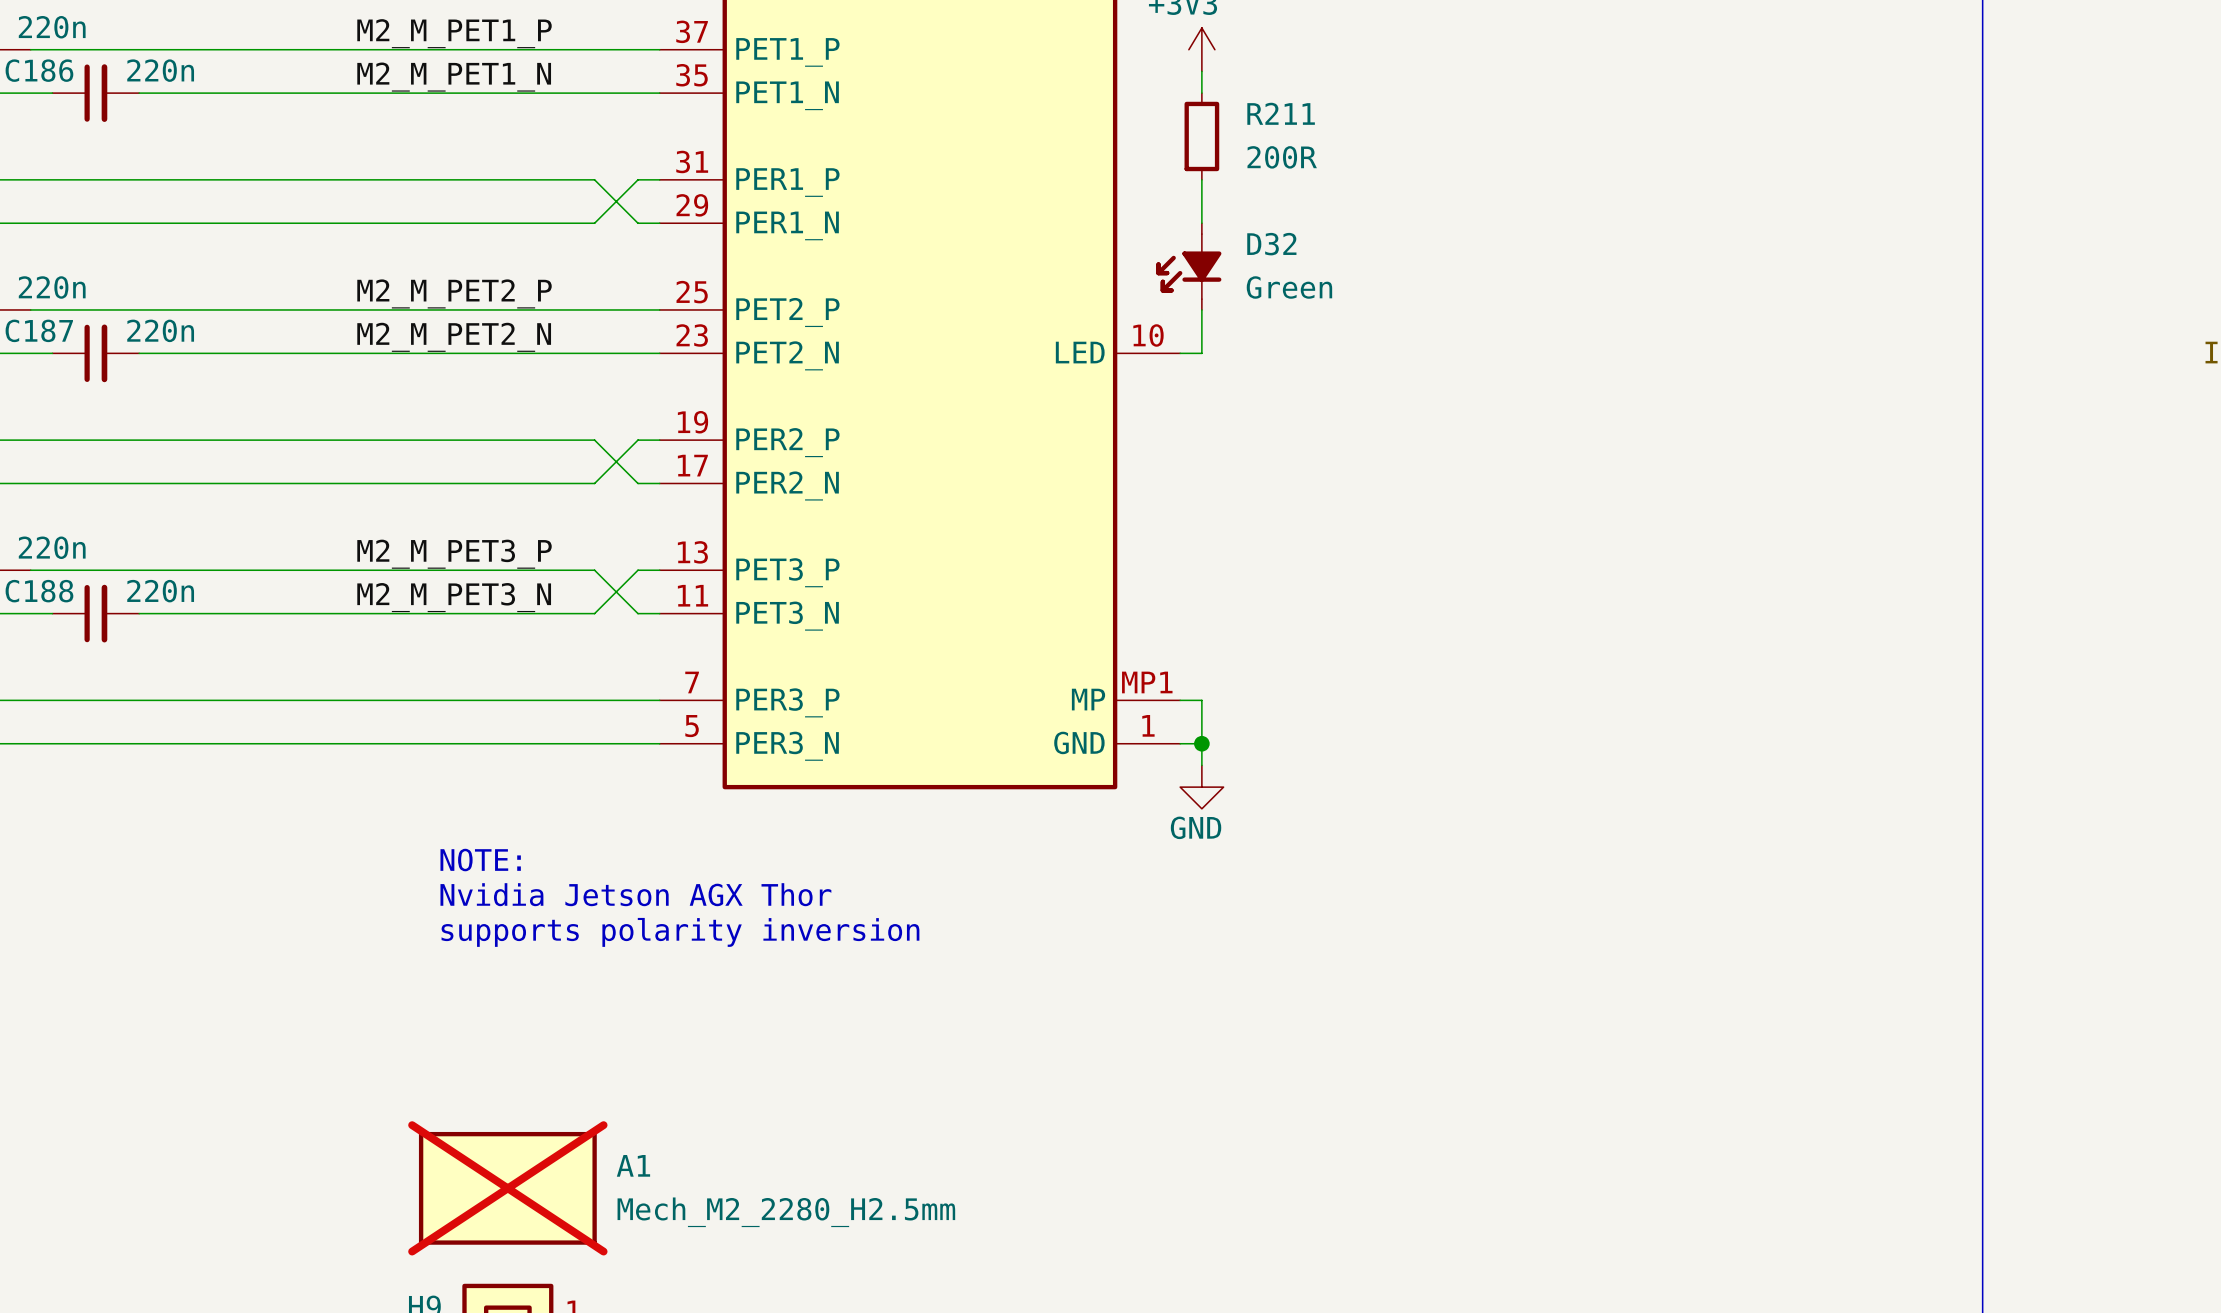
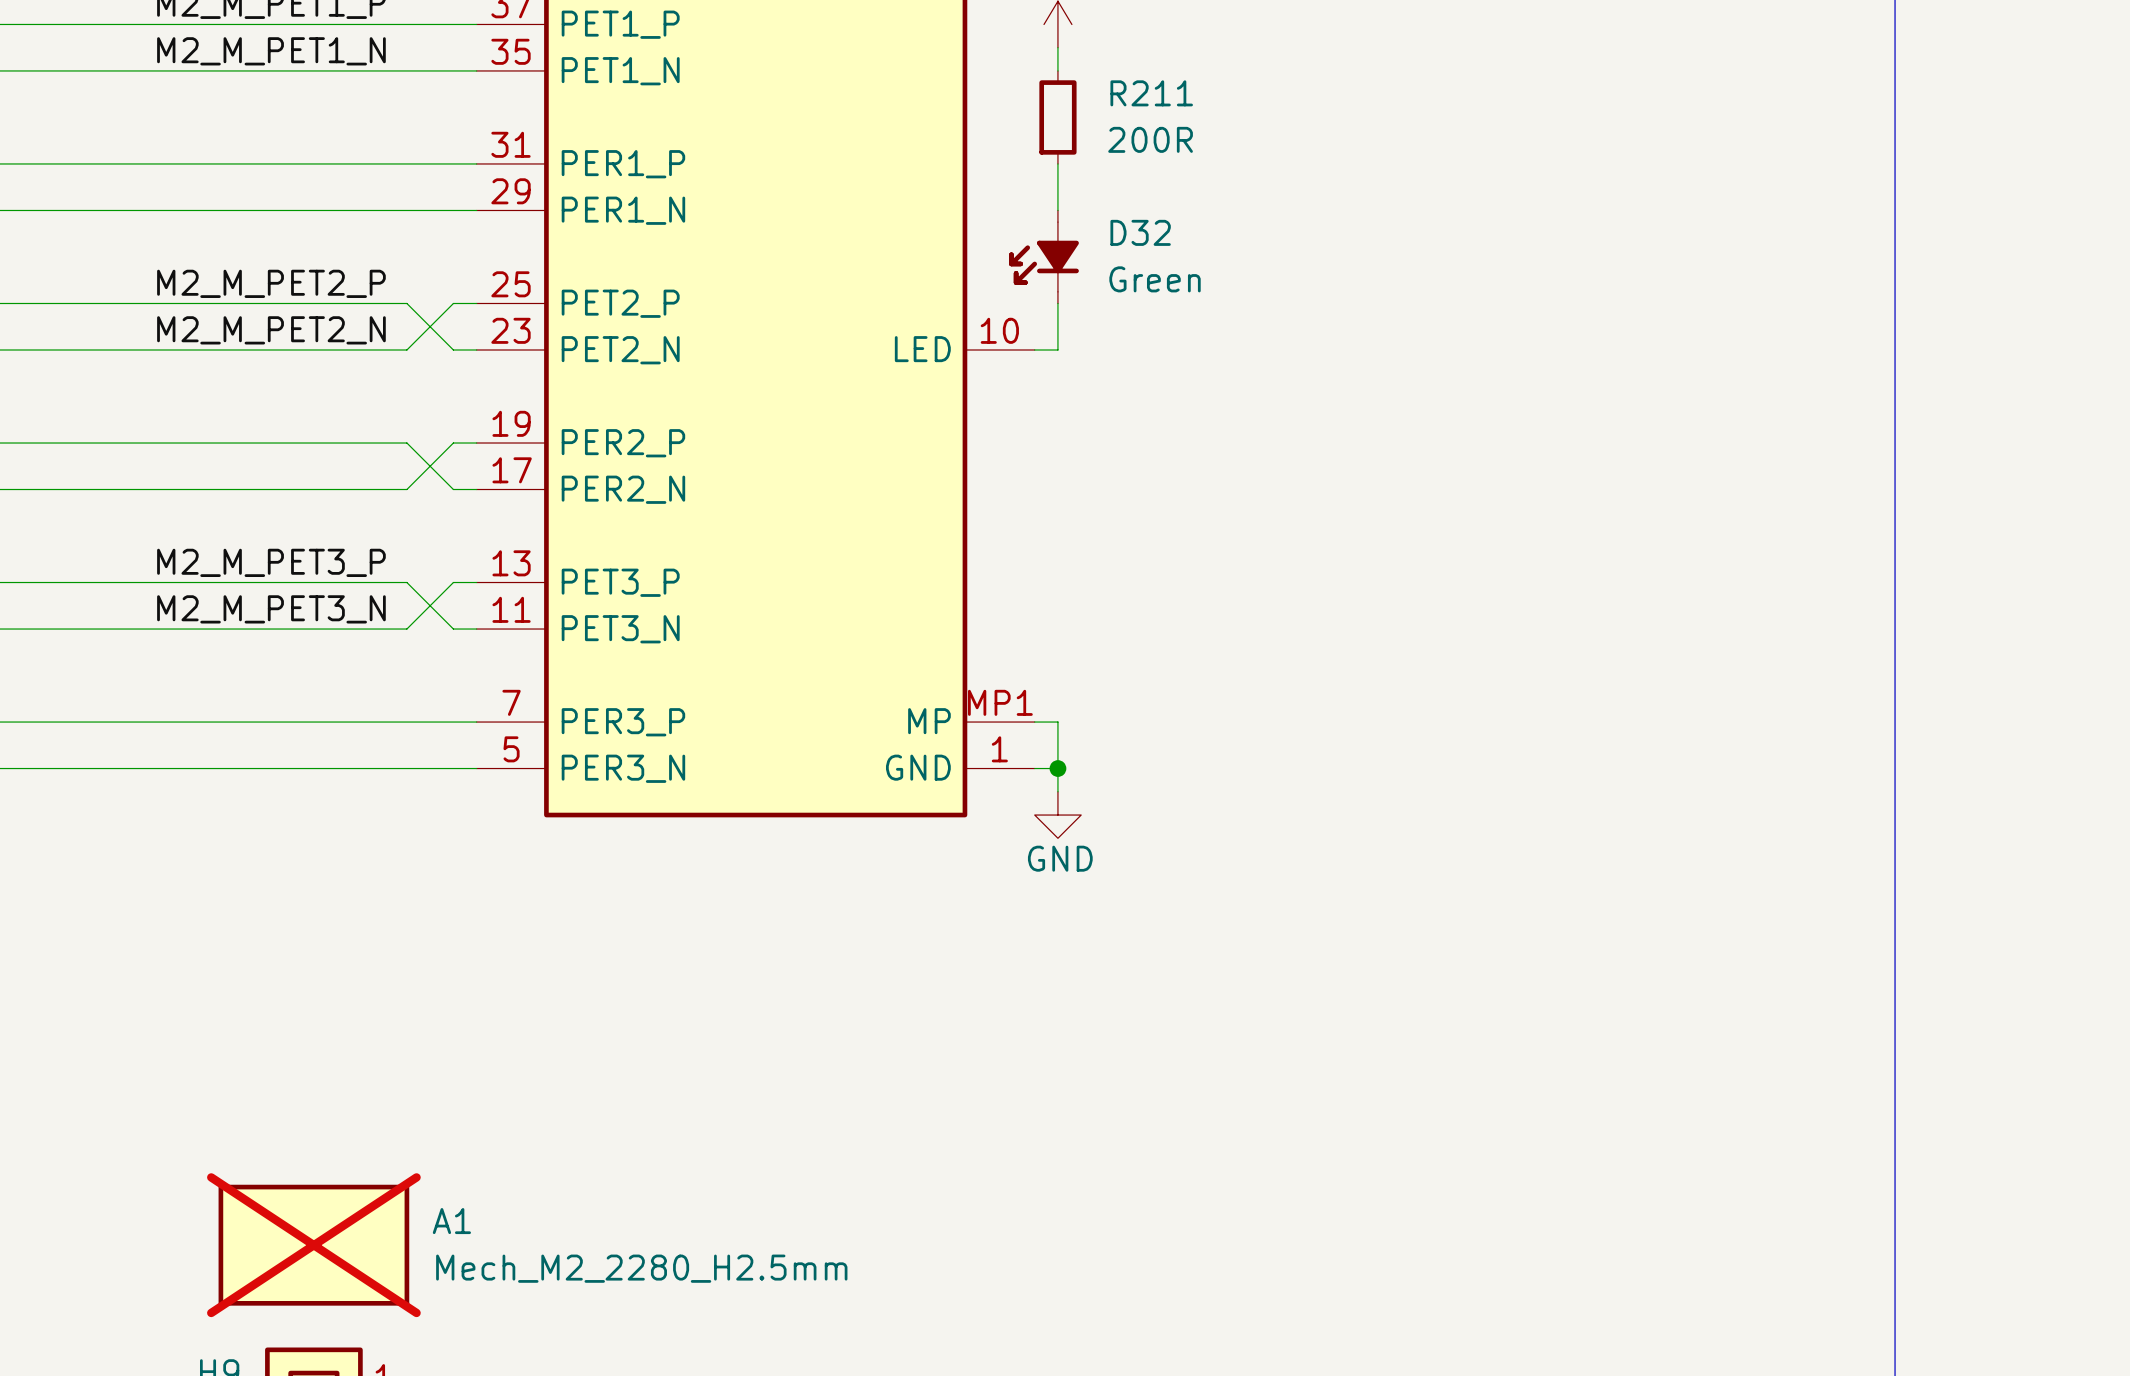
wire: (594, 179) (637, 223) -> (406, 163) (453, 163)
wire: (637, 179) (594, 223) -> (453, 210) (406, 210)
wire: (594, 309) (637, 309) -> (406, 303) (453, 349)
wire: (594, 353) (637, 353) -> (406, 349) (453, 303)
text: NOTE: (480, 860) -> none
text: Nvidia Jetson AGX Thor (635, 894) -> none
text: supports polarity inversion (680, 932) -> none

